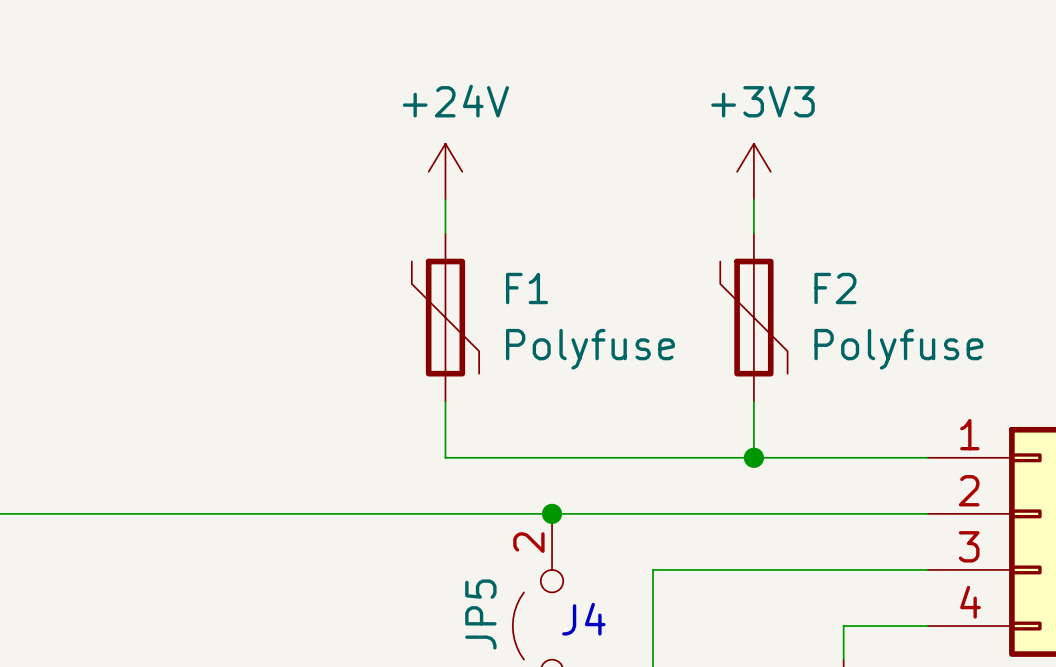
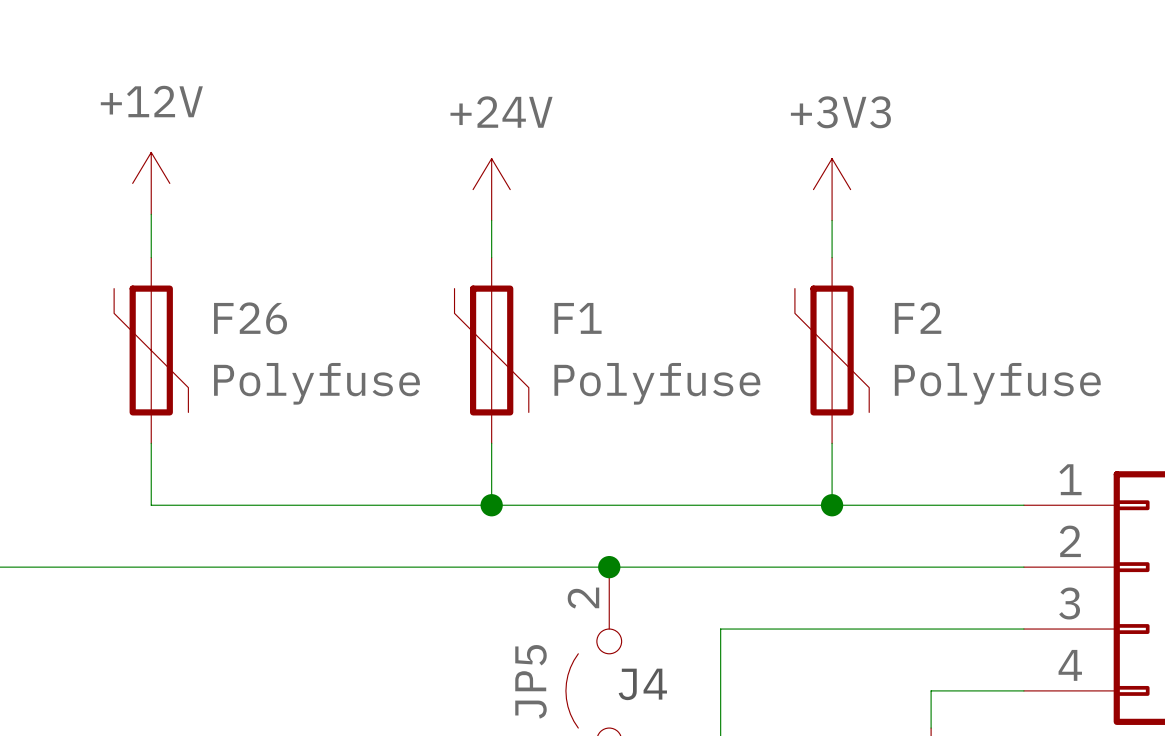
power symbol: none -> +12V (151, 183)
wire: none -> (151, 214) (151, 257)
F26: none -> Polyfuse (151, 350)
wire: none -> (151, 443) (151, 505) (491, 505)
junction: none -> (491, 505)

